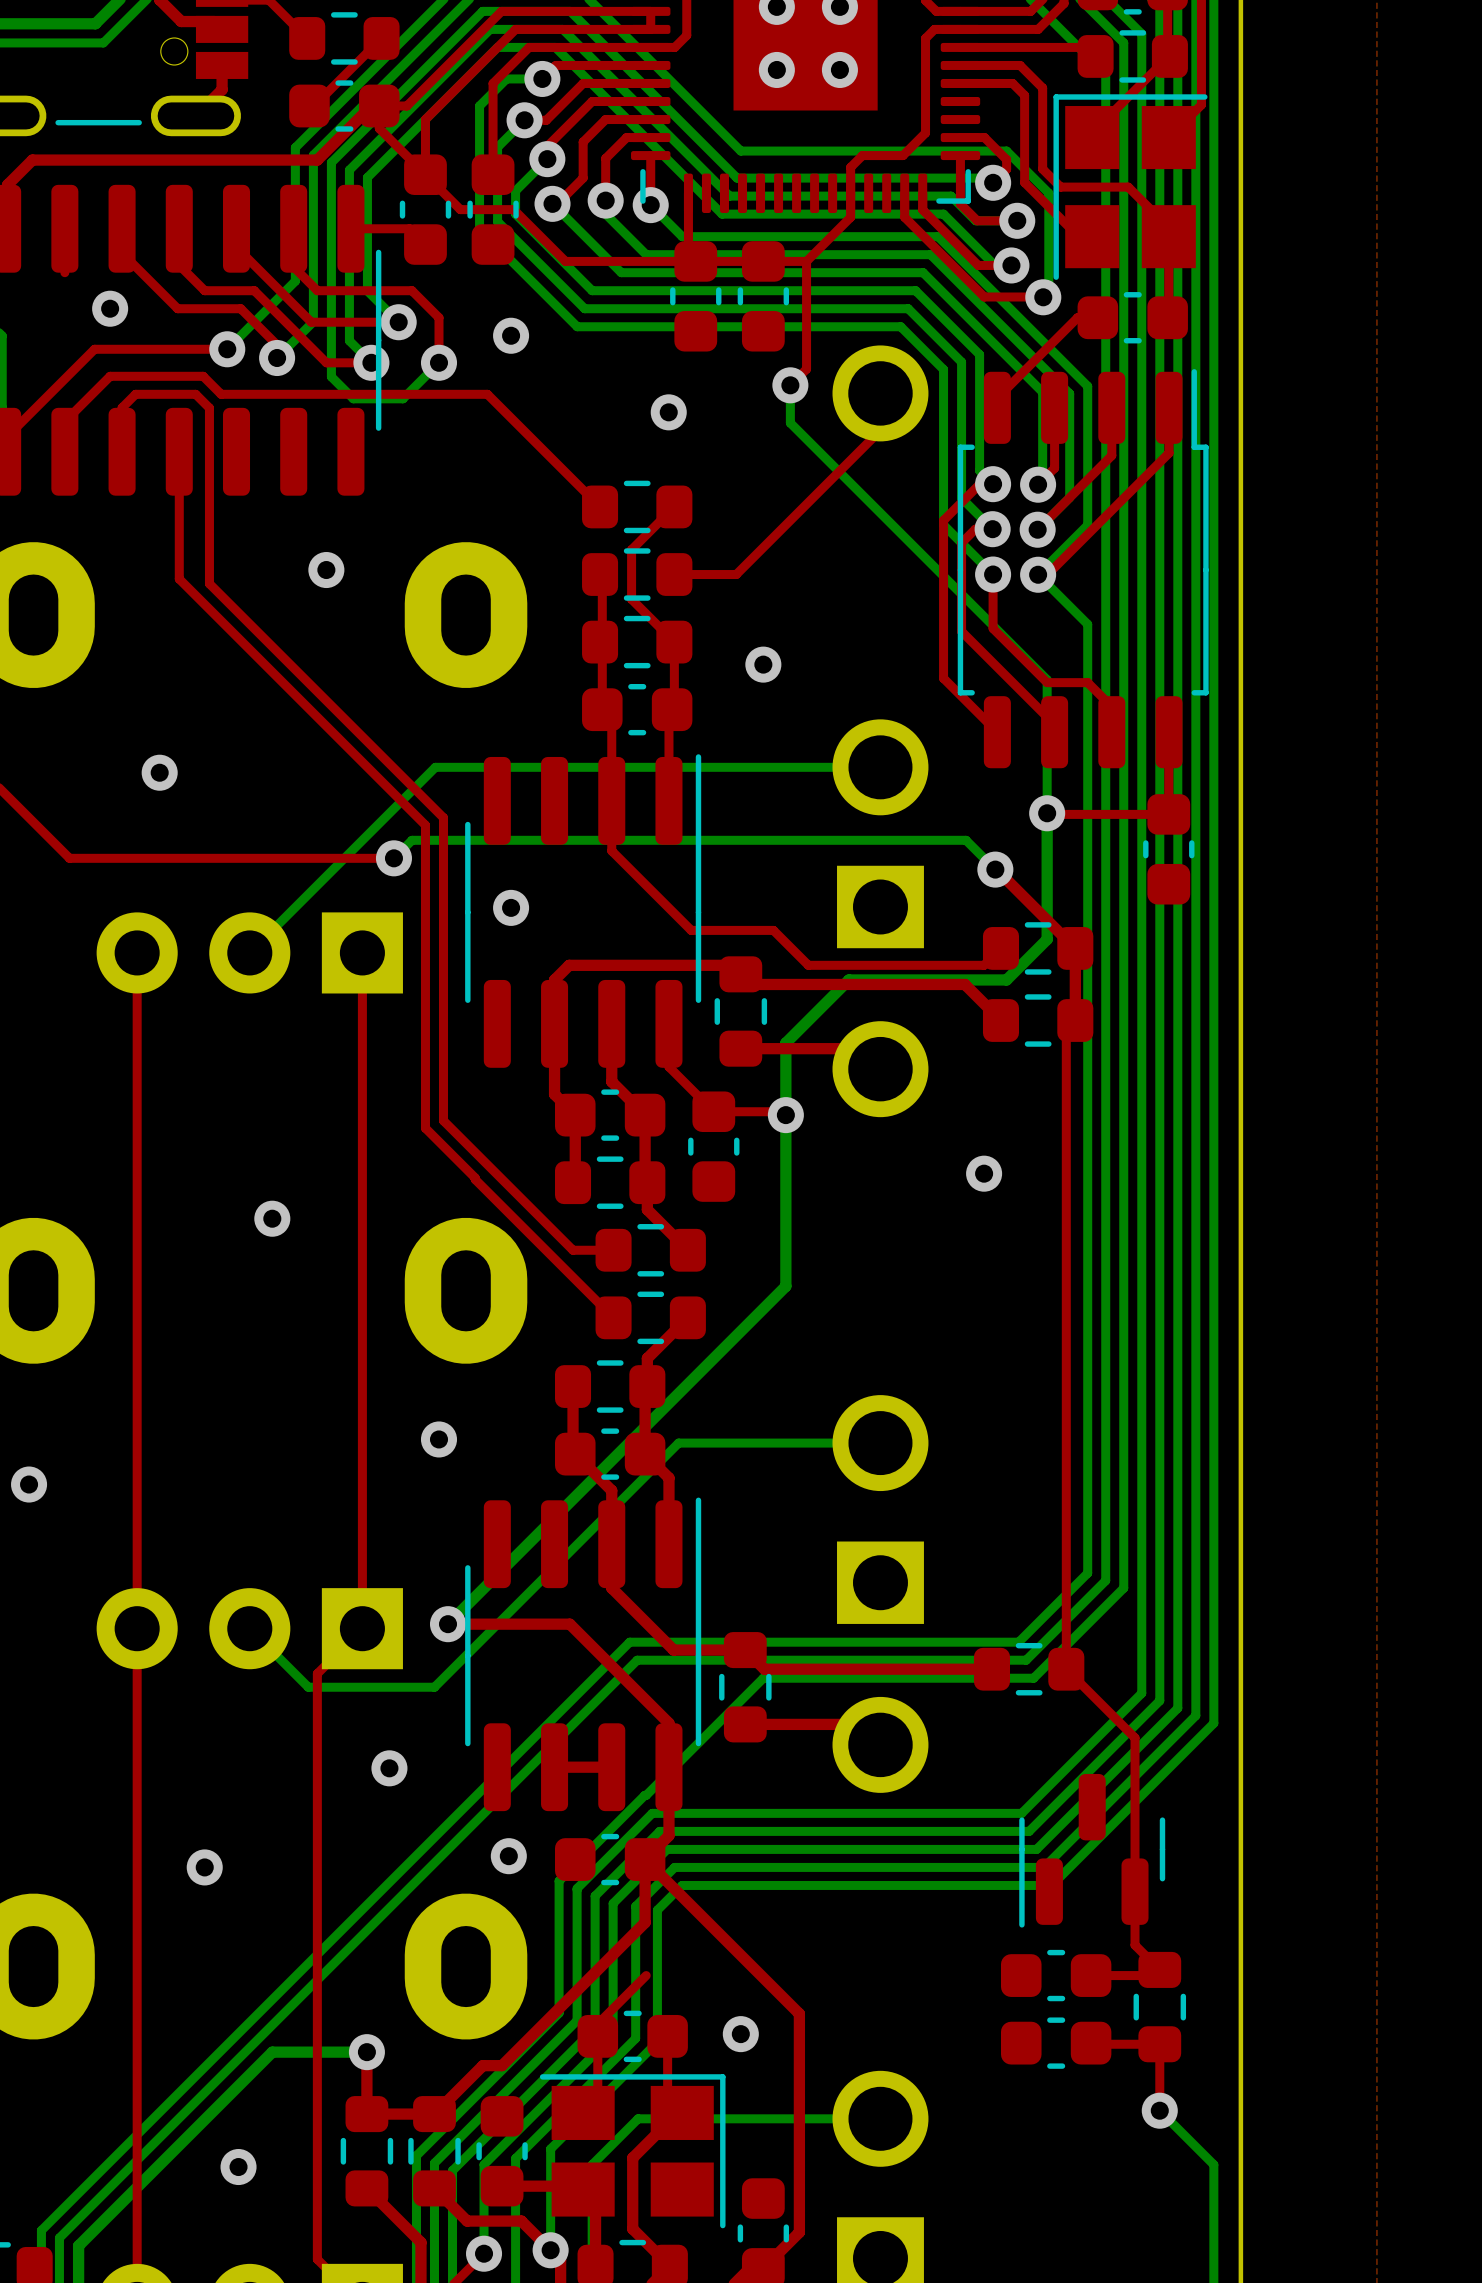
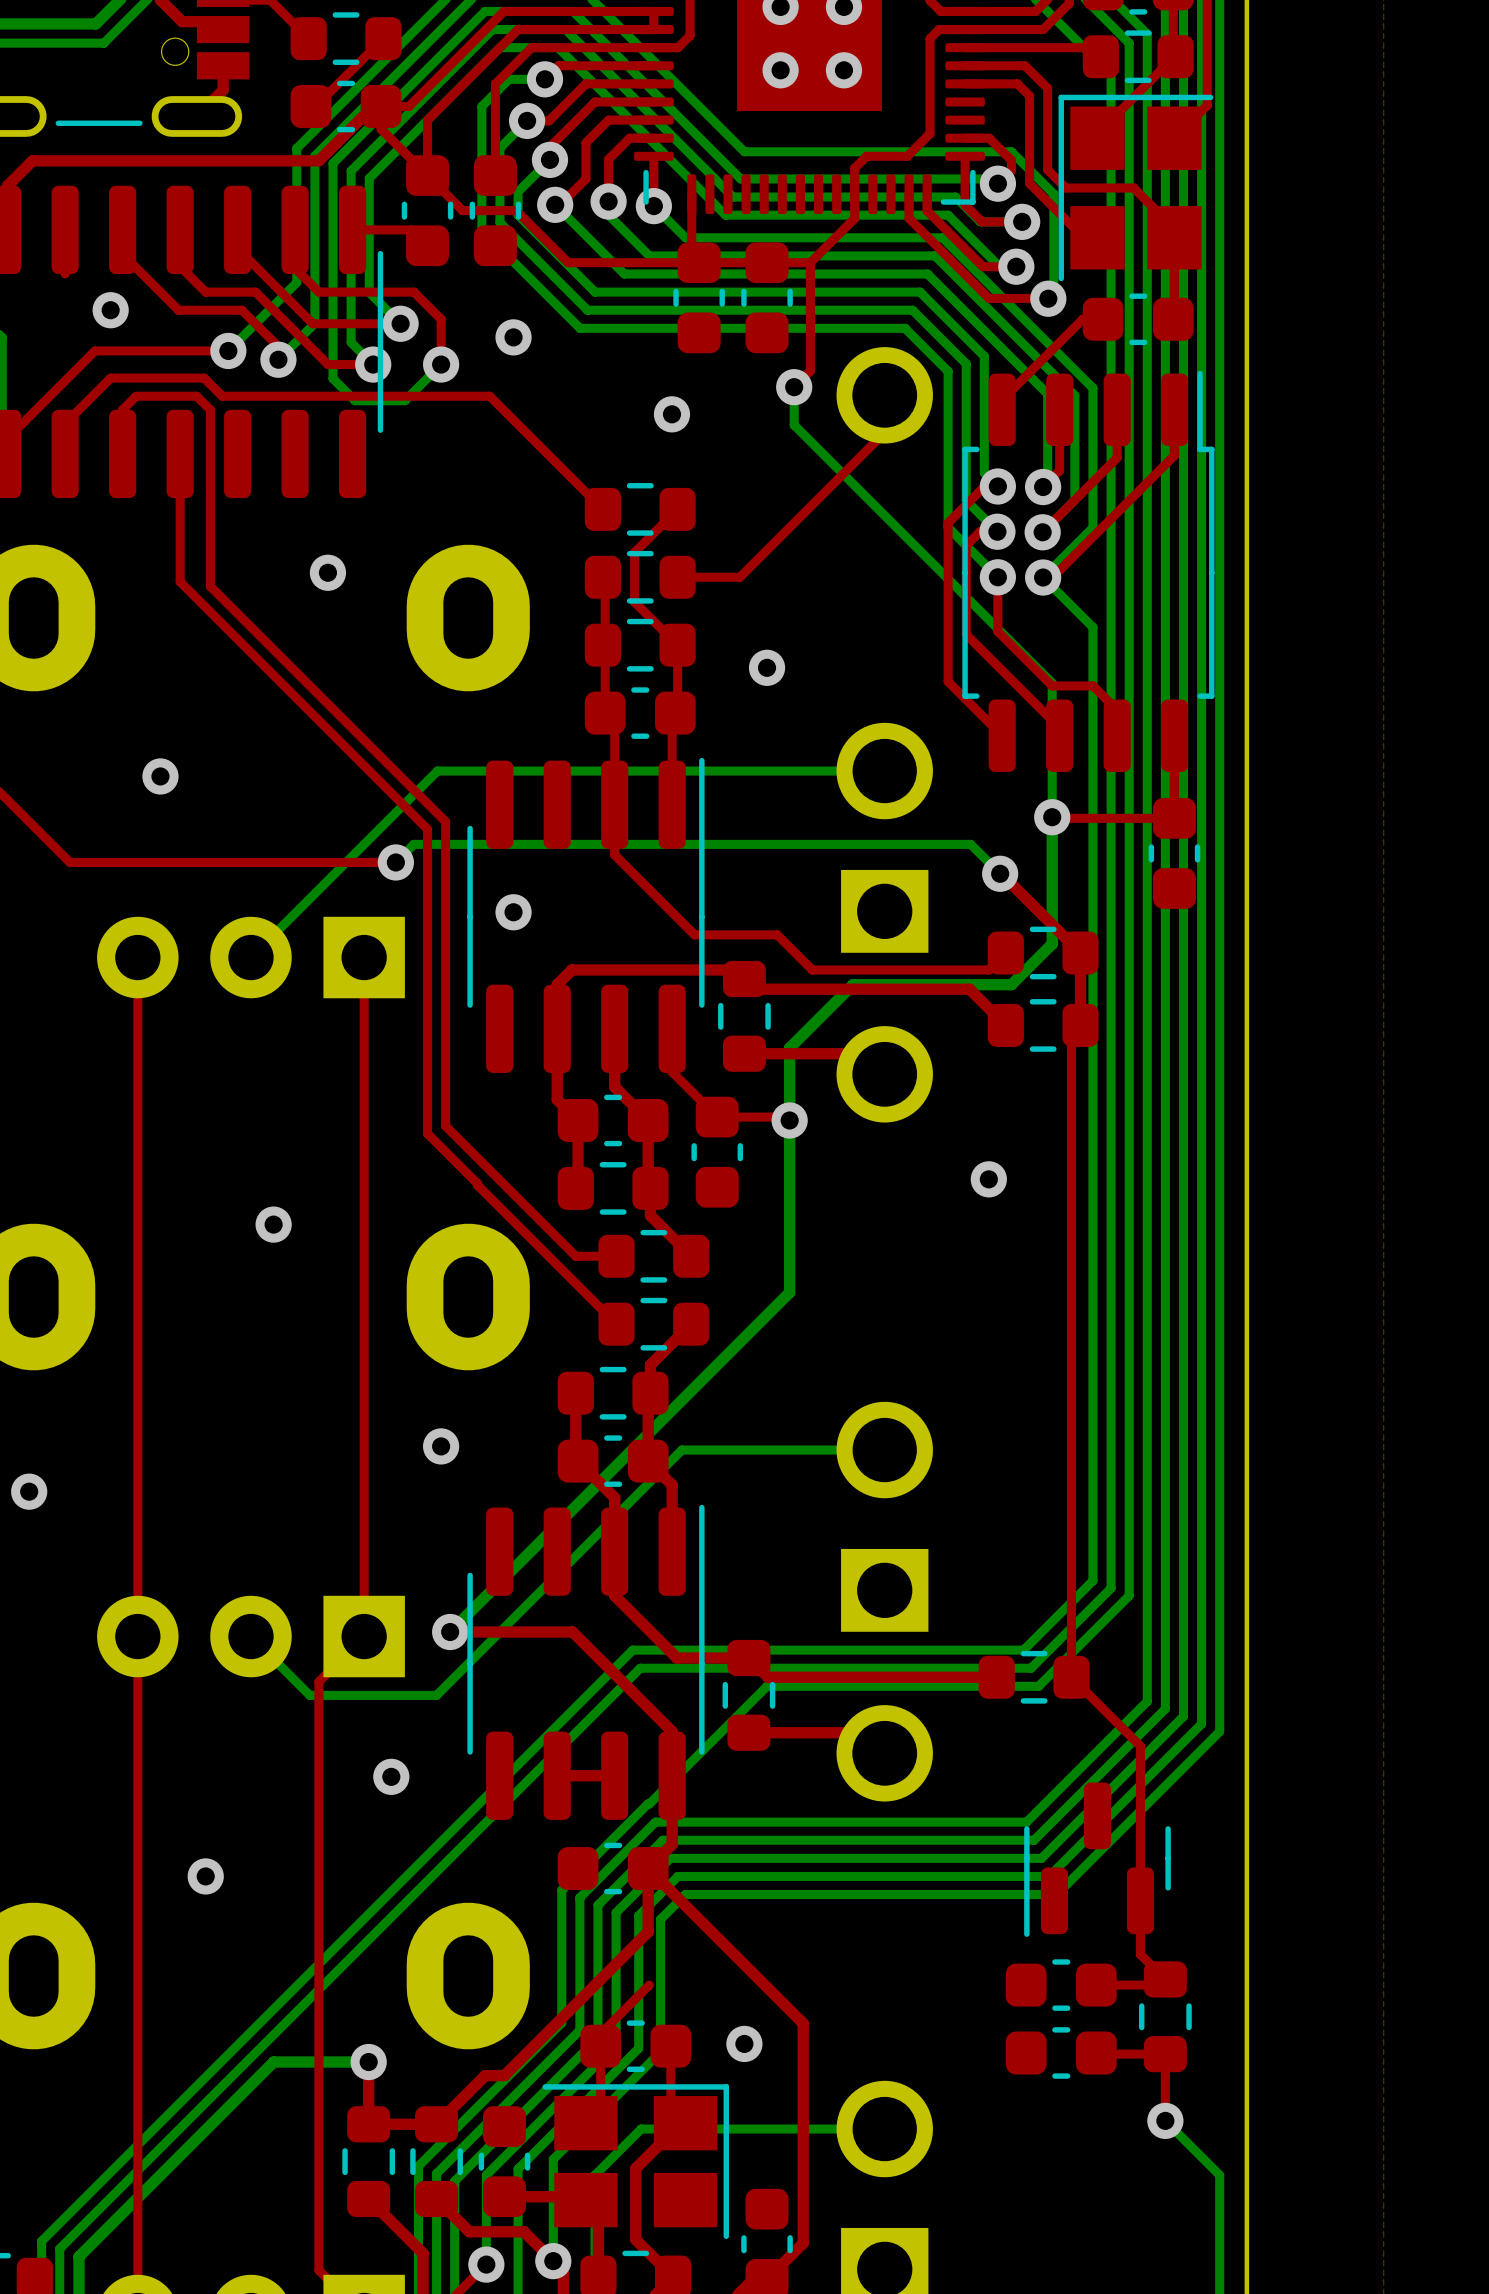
via: (508, 1856) -> none
via: (238, 2167) -> none

